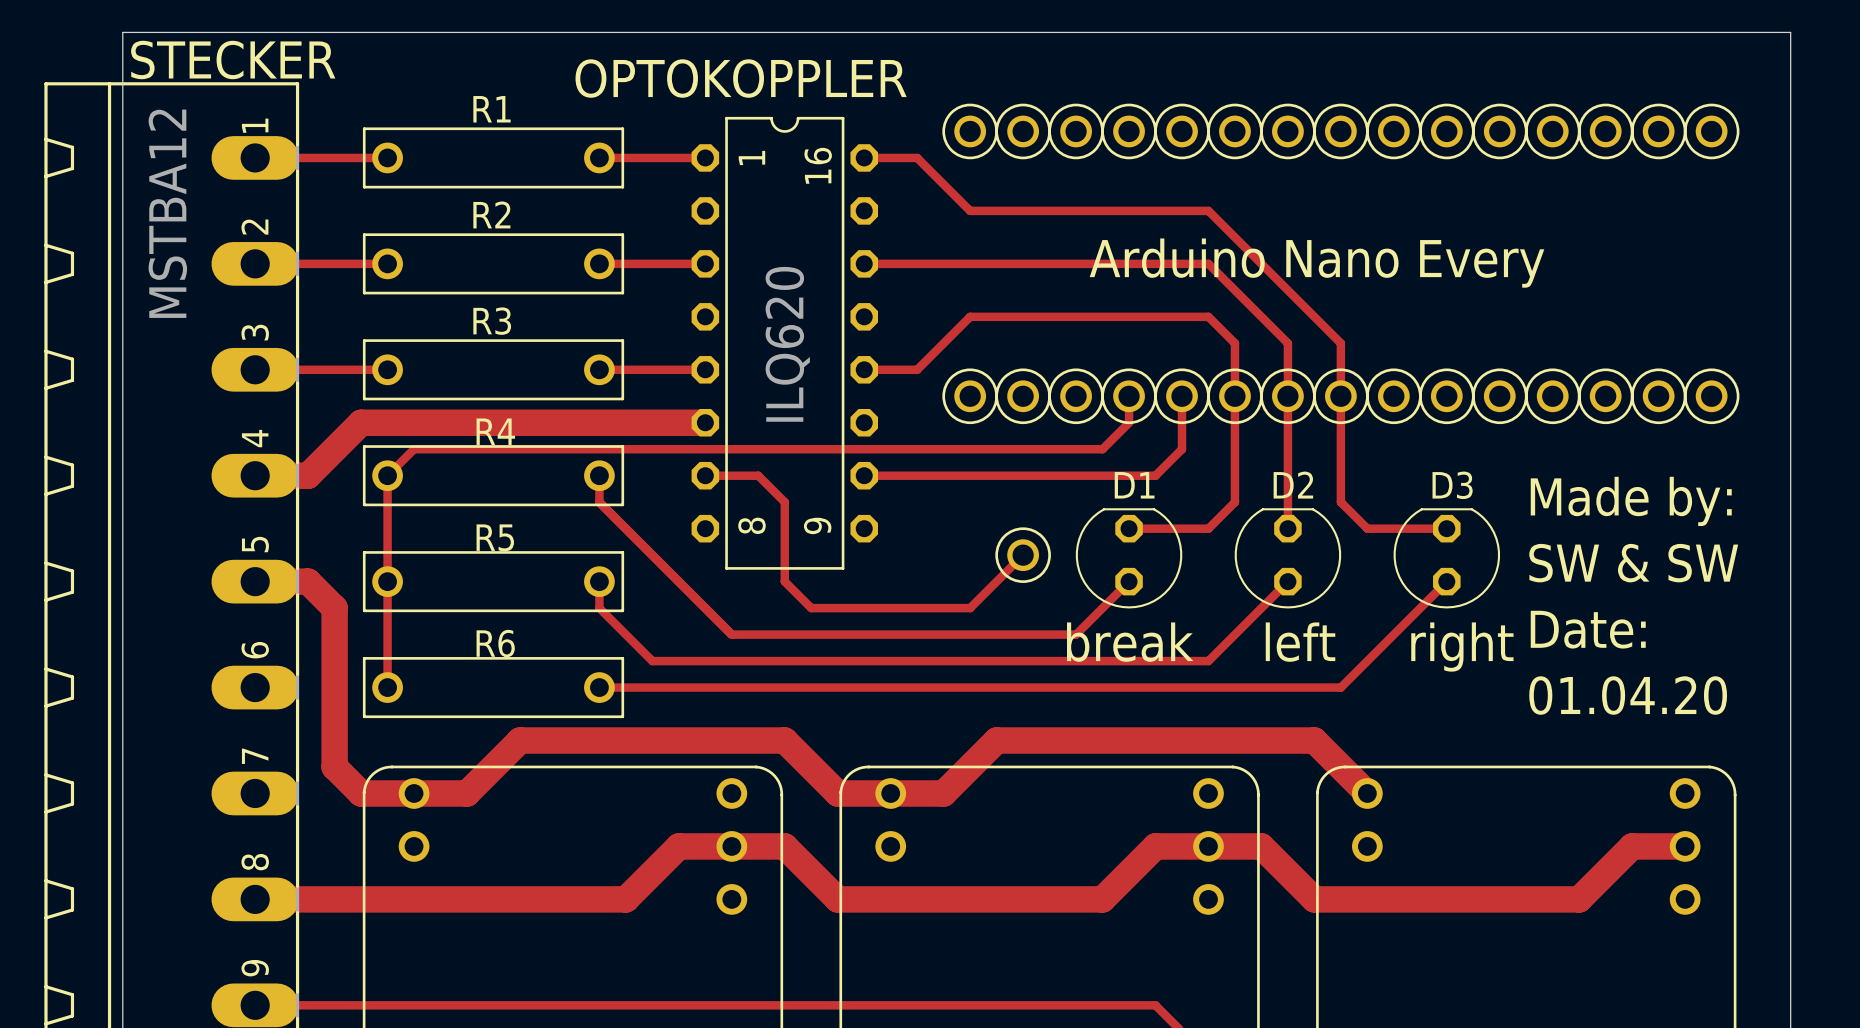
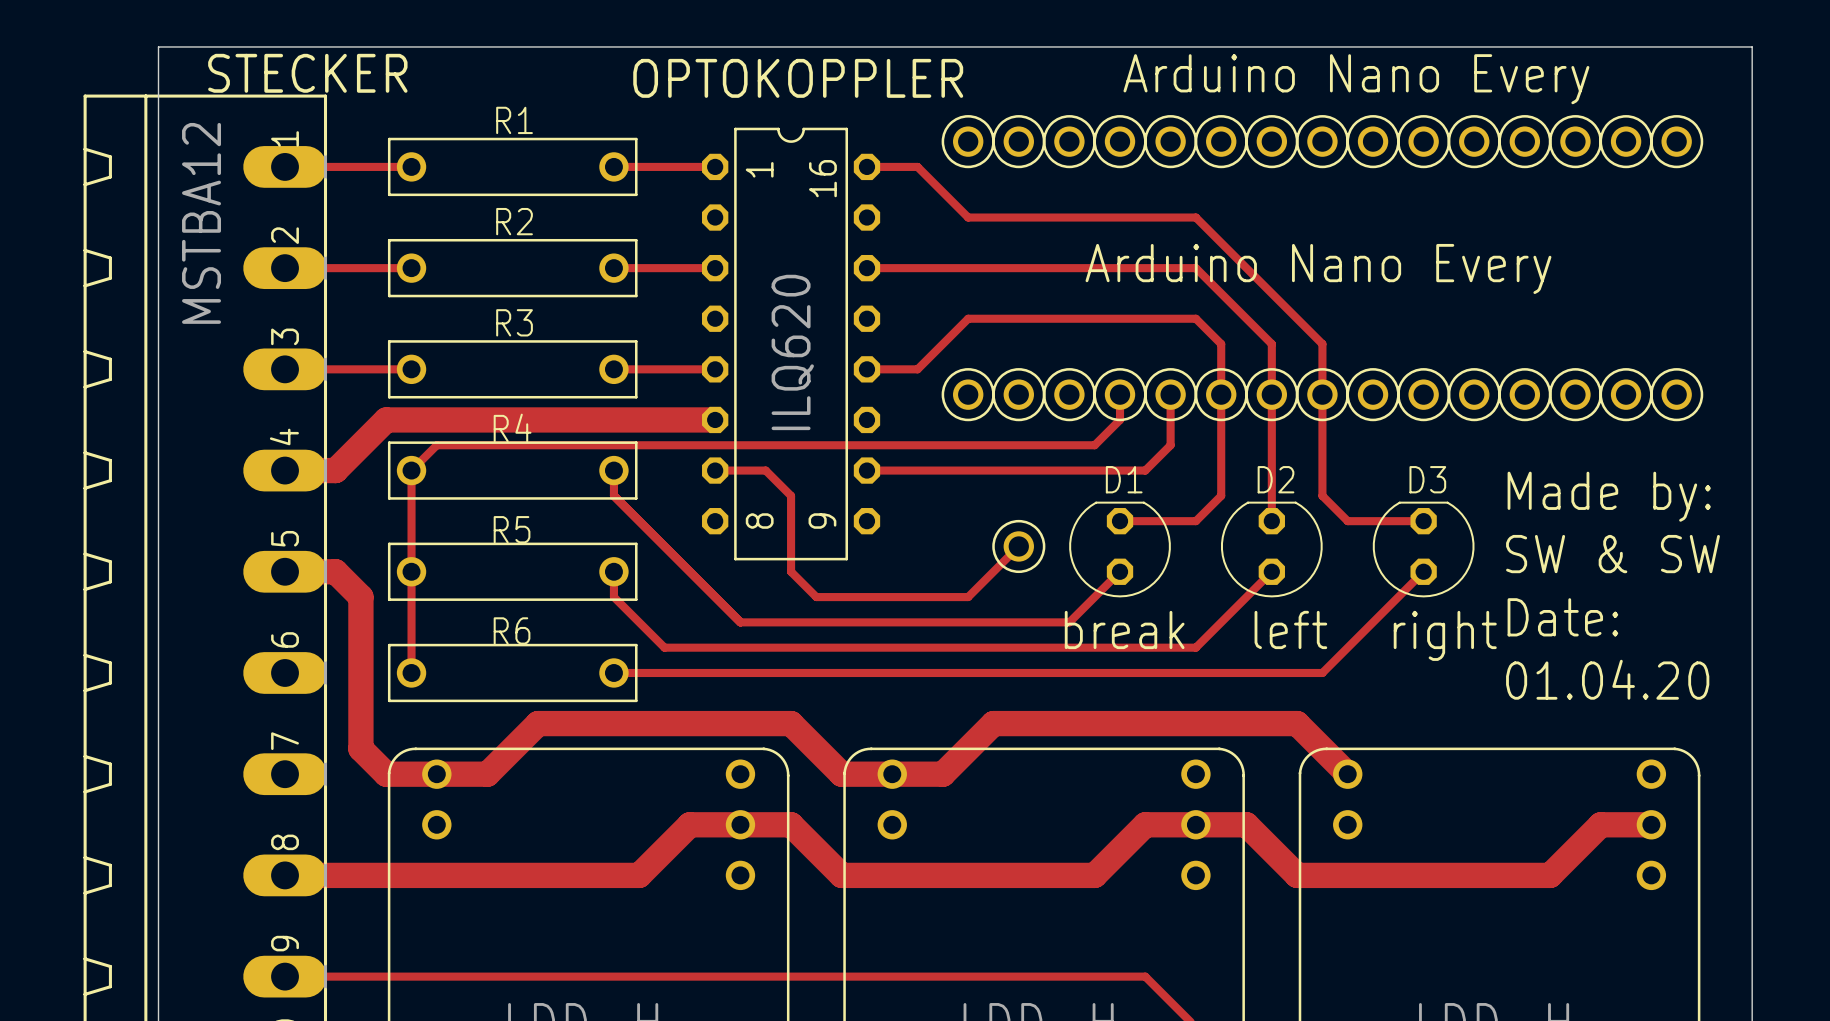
STECKER name position: STECKER (233, 60) -> STECKER (307, 73)
text: none -> Arduino Nano Every (1356, 79)
OPTOKOPPLER name position: OPTOKOPPLER (741, 78) -> OPTOKOPPLER (798, 78)

